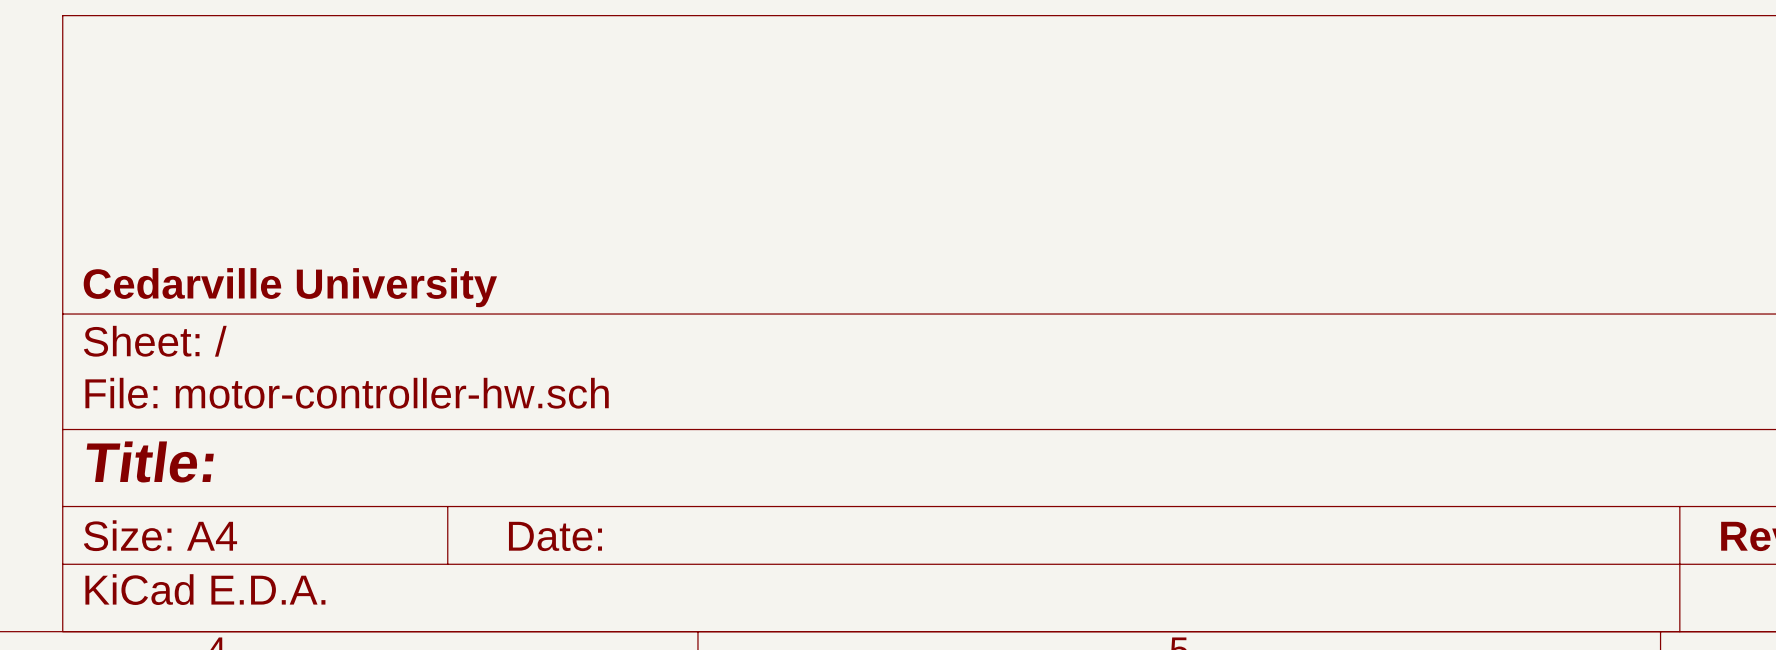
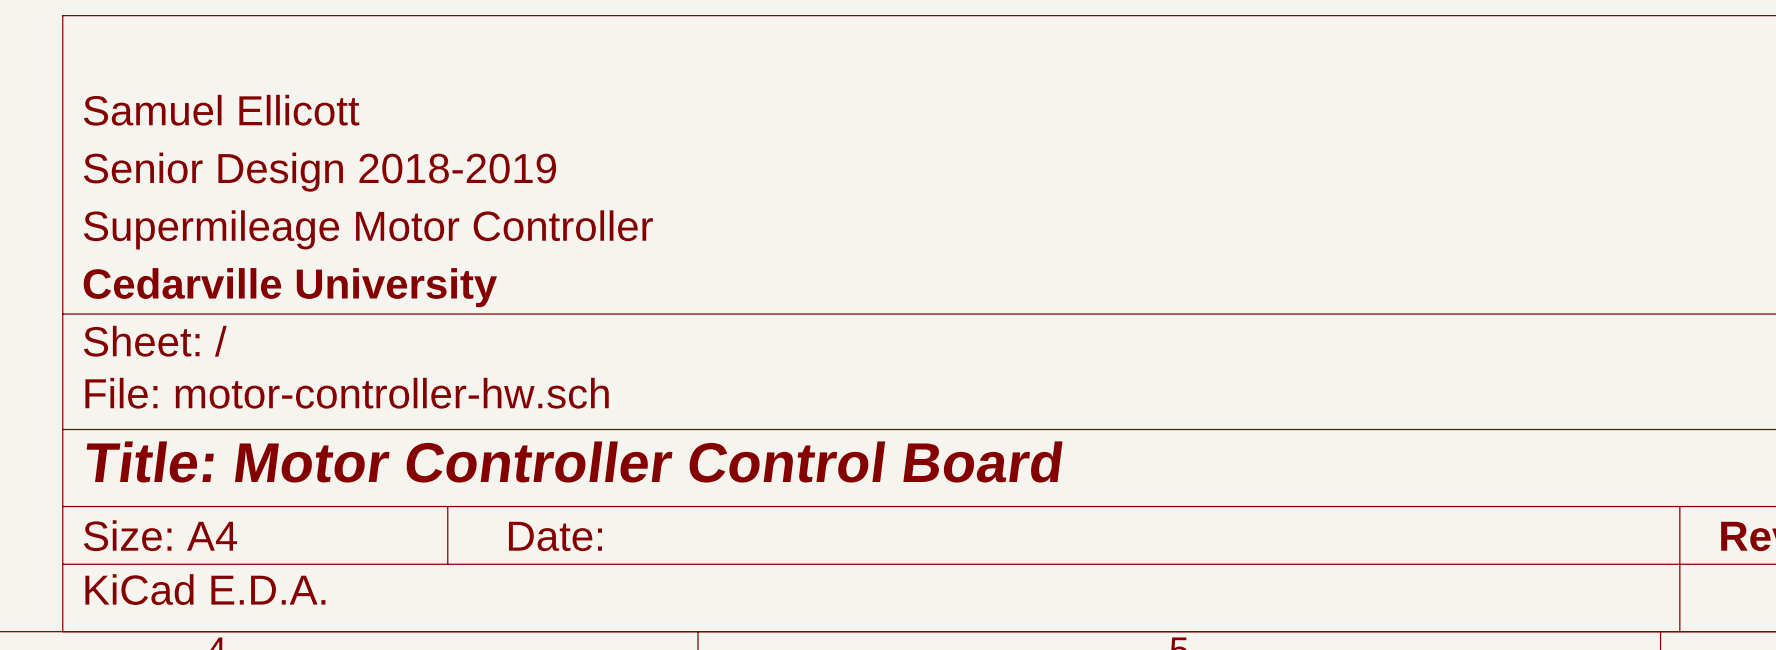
title block: none -> Samuel Ellicott (221, 110)
title block: none -> Senior Design 2018-2019 (319, 172)
title block: none -> Supermileage Motor Controller (368, 229)
title block: Title: (150, 461) -> Title: Motor Controller Control Board (574, 461)

